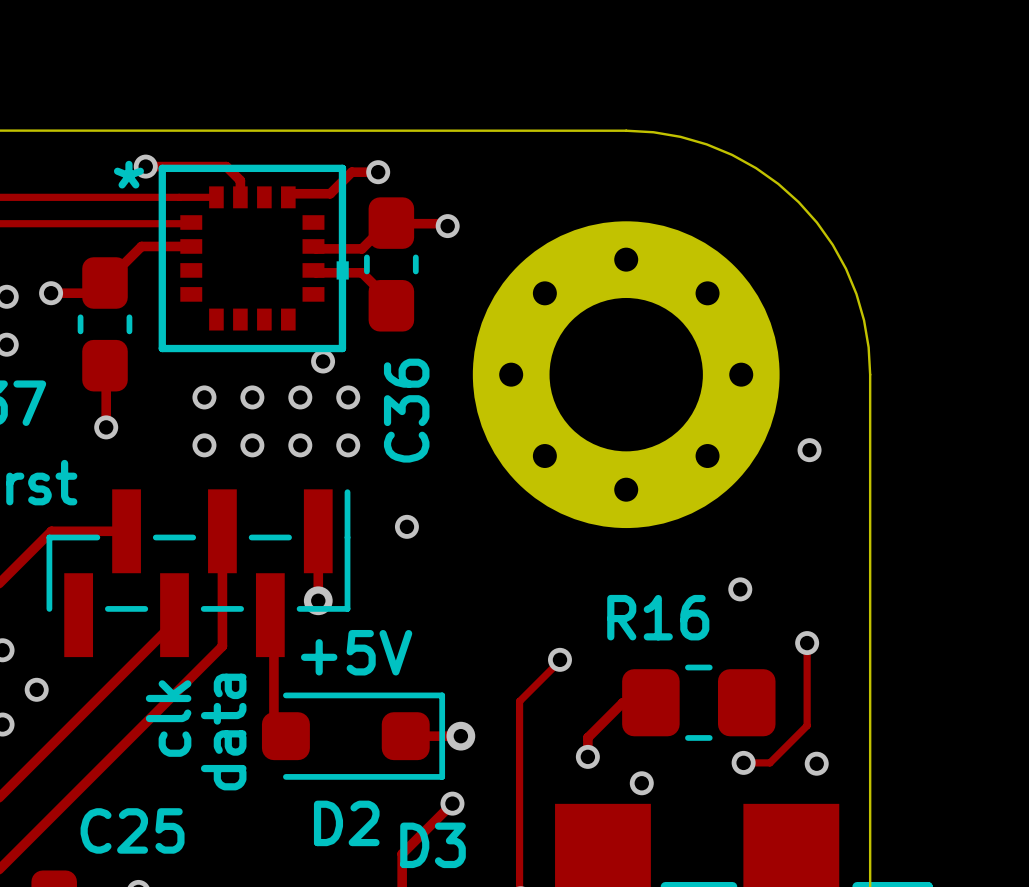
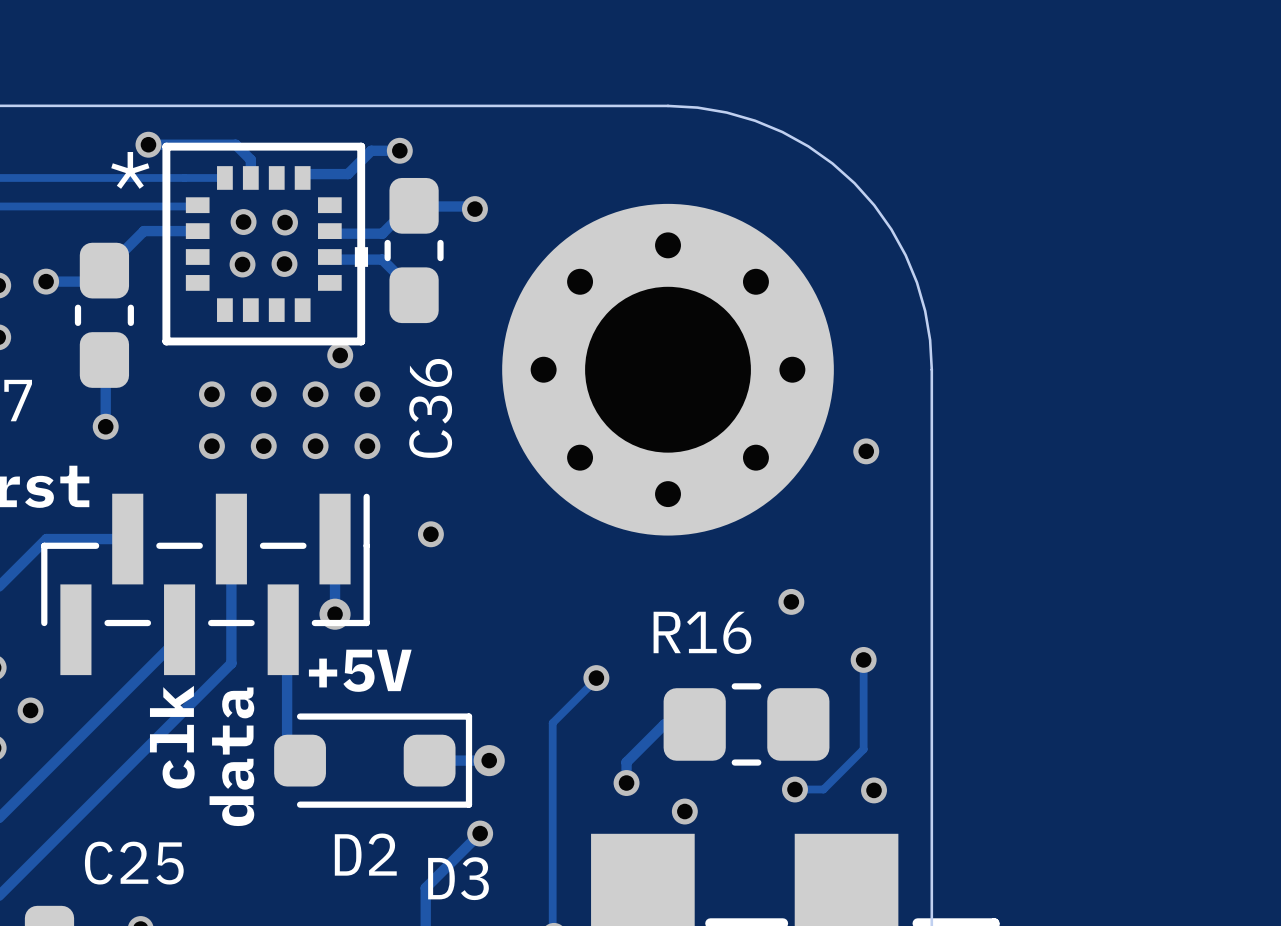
via: none -> (243, 222)
via: none -> (285, 222)
via: none -> (284, 264)
via: none -> (242, 264)

